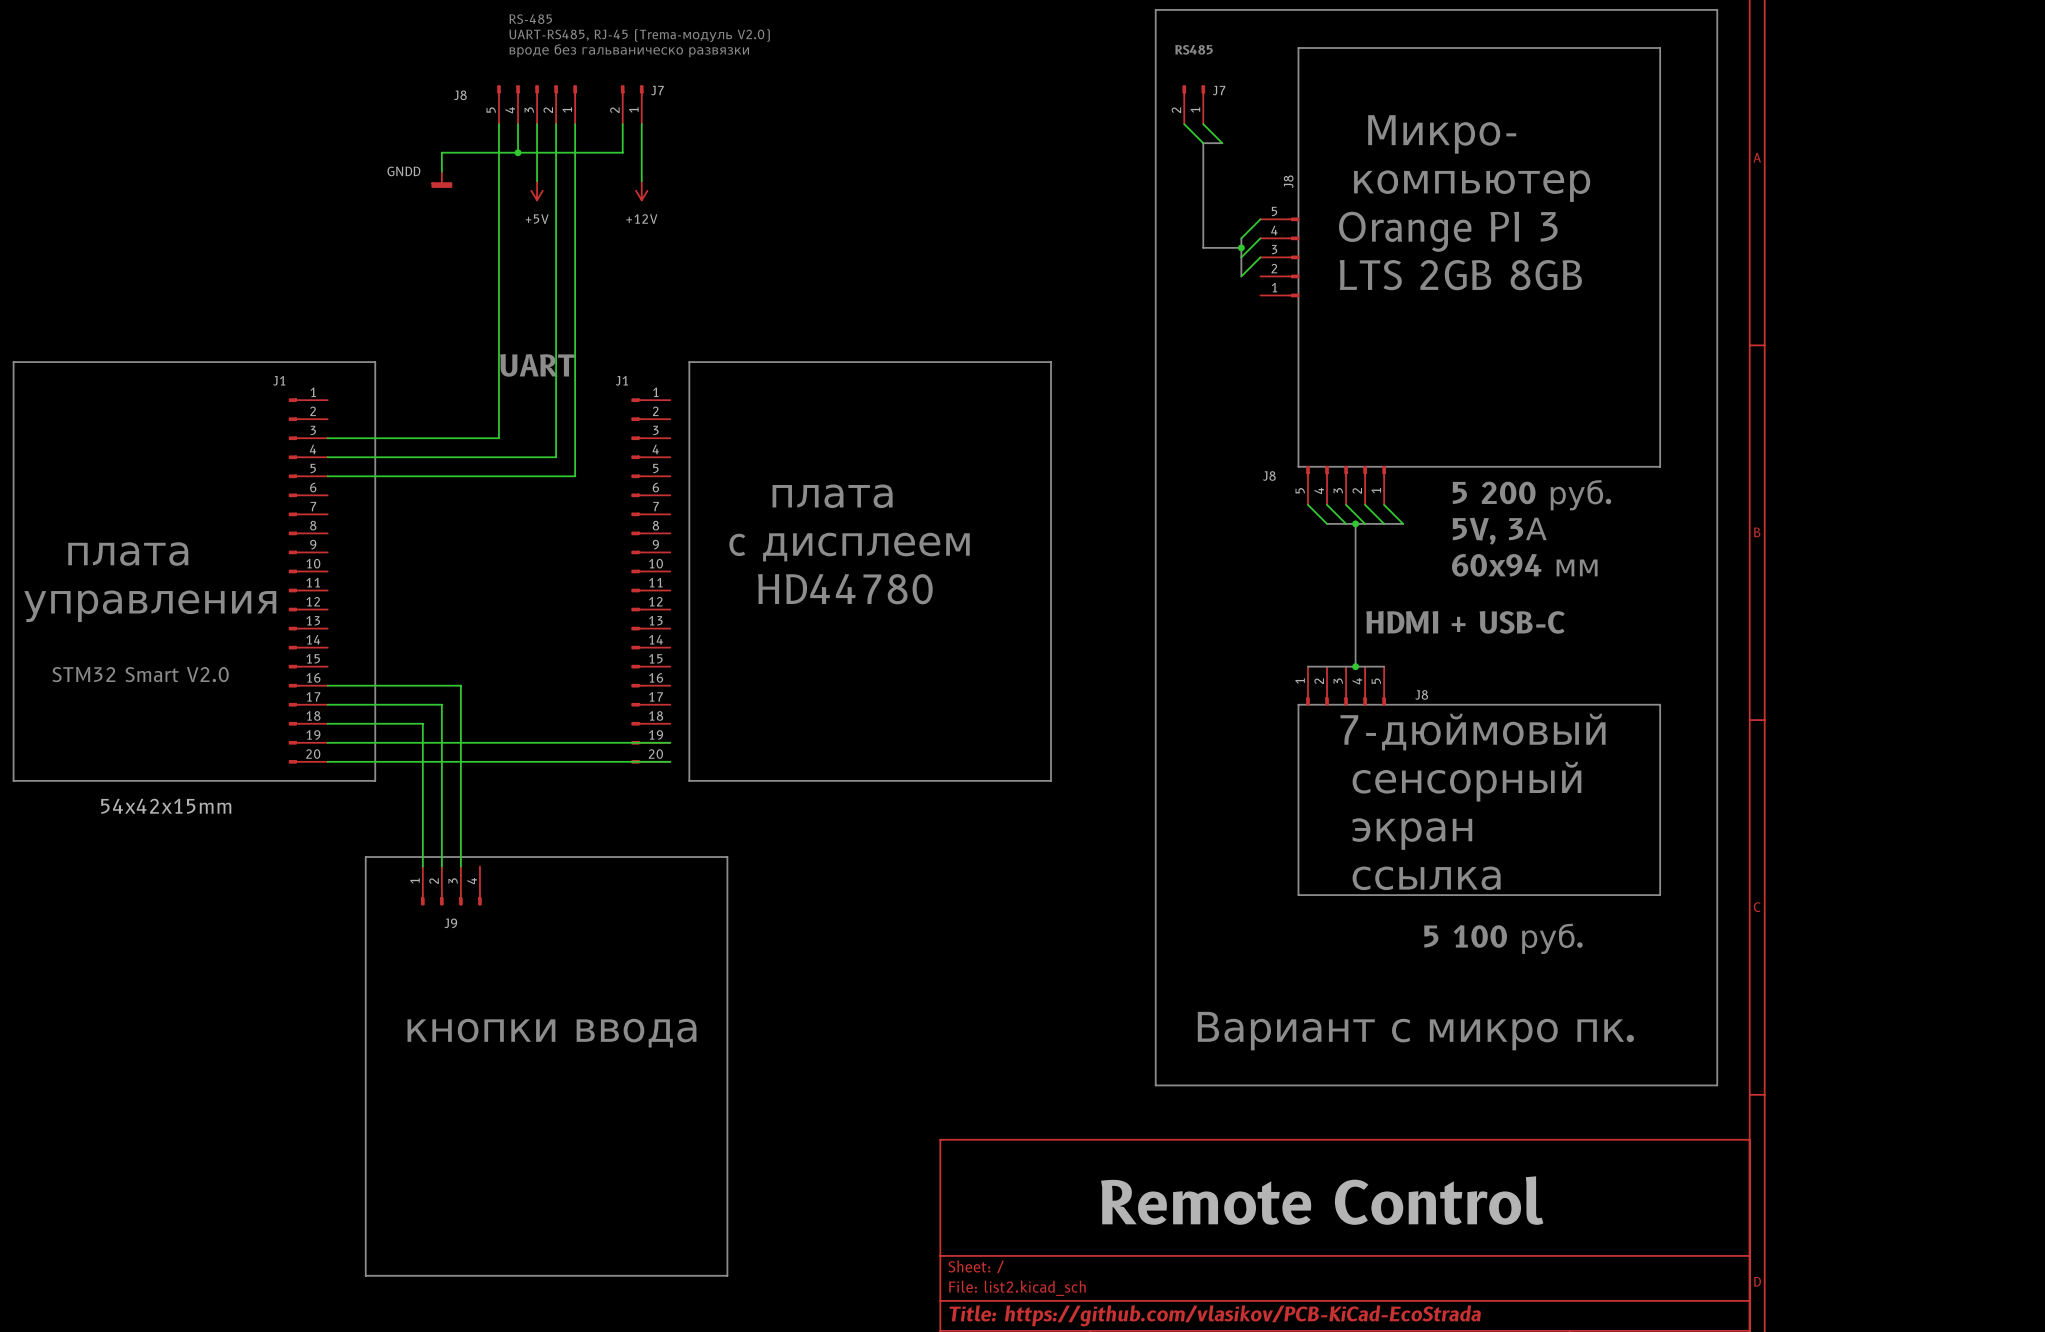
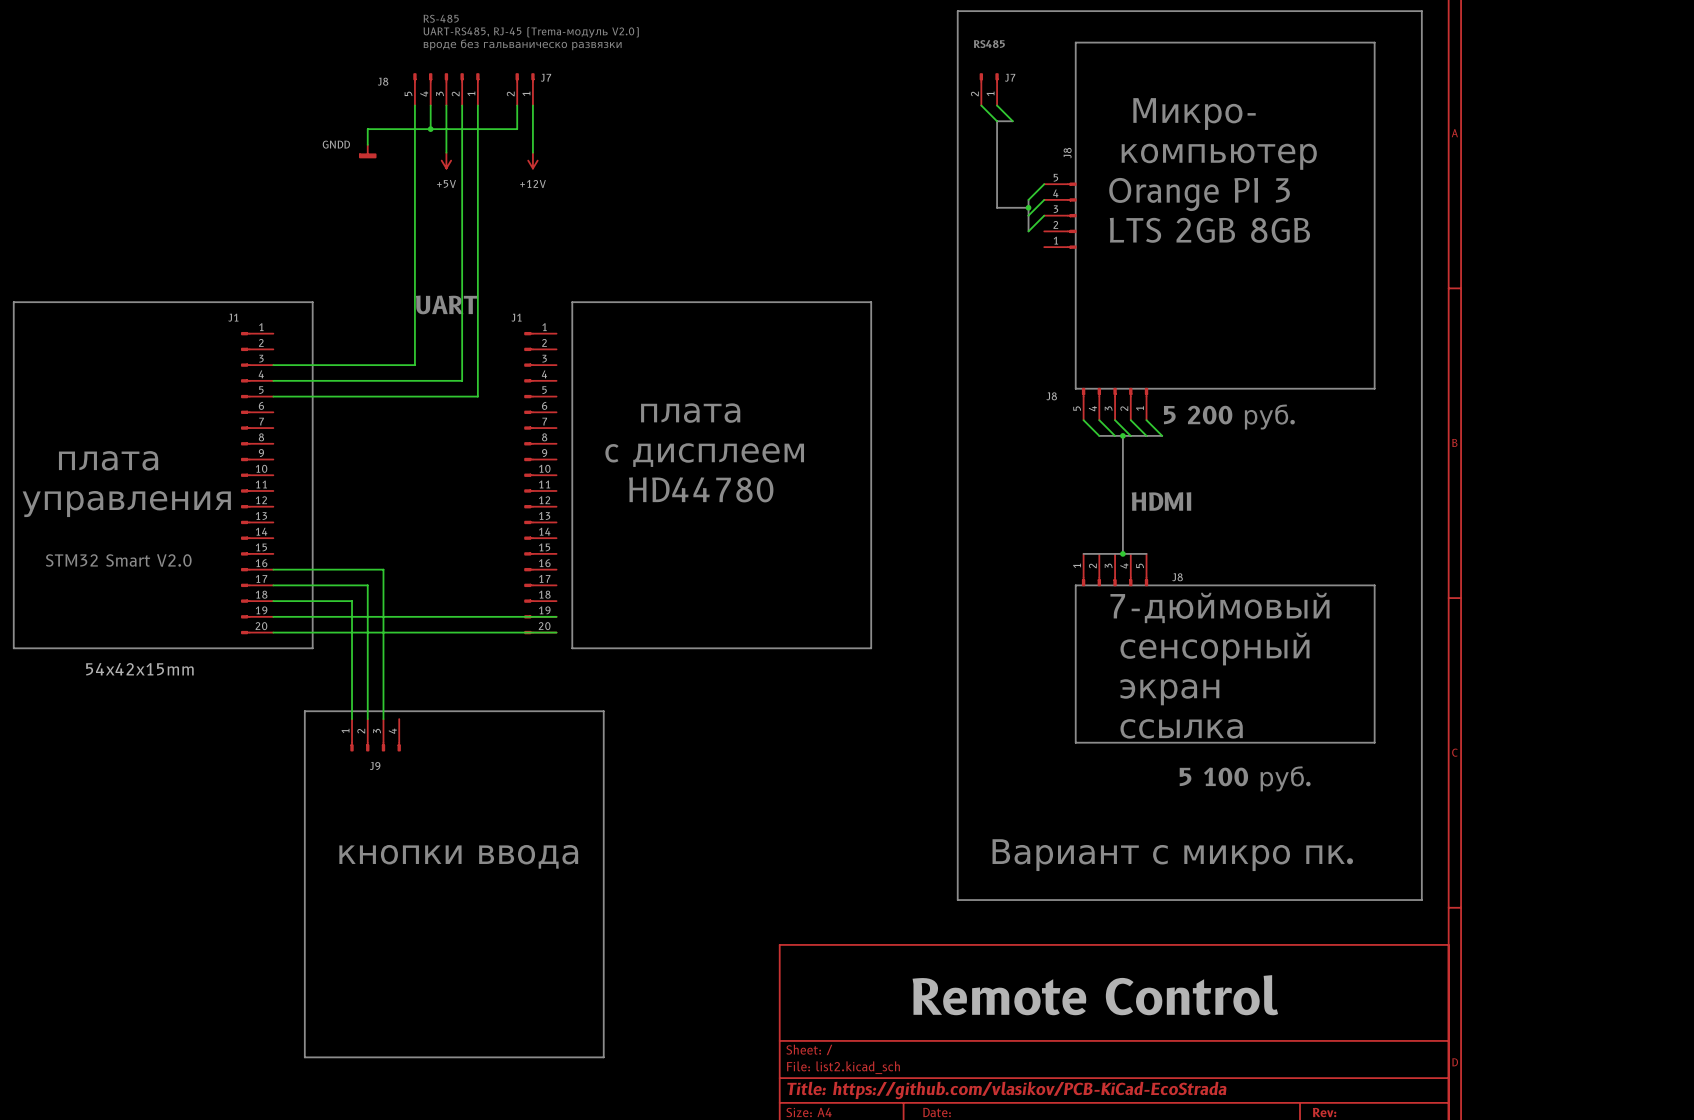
text position: 5 200 руб. (1532, 495) -> 5 200 руб. (1229, 416)
text: 5V, 3А (1499, 531) -> none
text: 60x94 мм (1524, 565) -> none
text: none -> HDMI (1161, 501)
text: HDMI + USB-C (1465, 622) -> none

